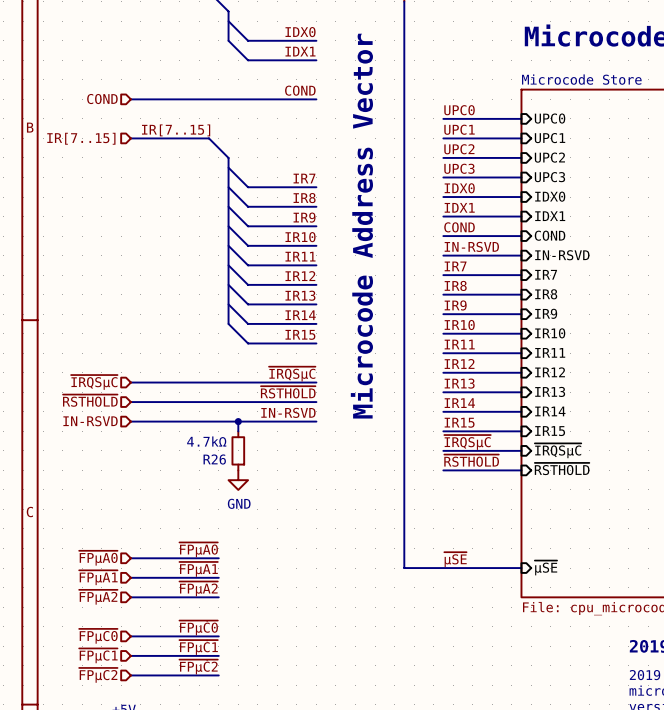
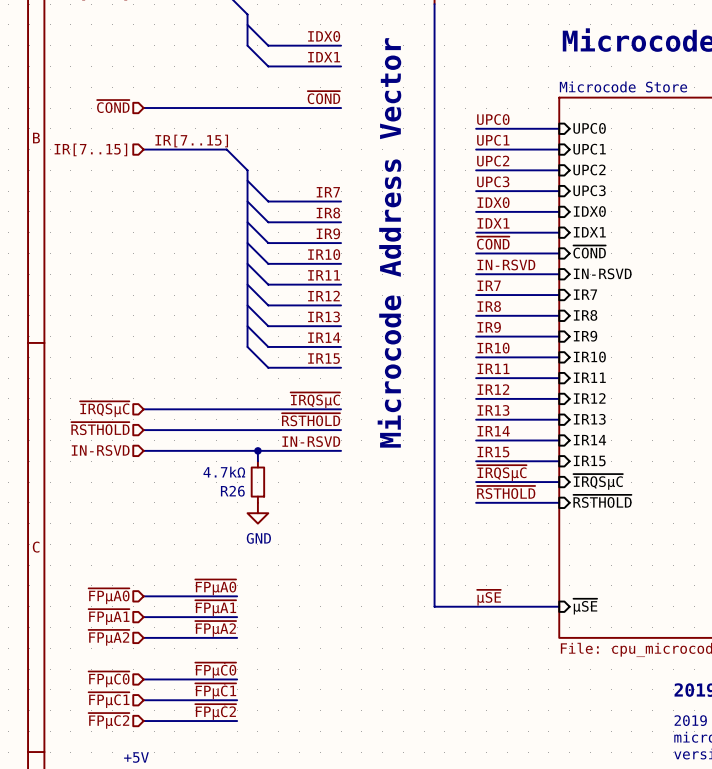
label: COND (300, 90) -> ~{COND} (323, 97)
hierarchical label: COND (102, 99) -> ~{COND} (113, 106)
label: COND (459, 227) -> ~{COND} (493, 243)
sheet pin: COND (550, 235) -> ~{COND} (589, 251)

